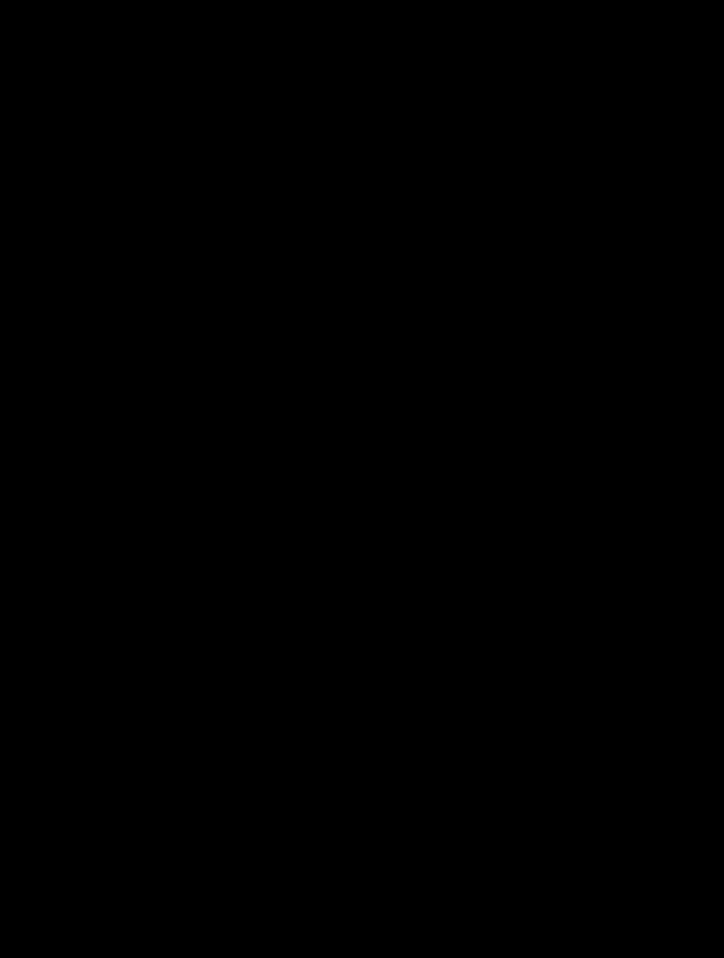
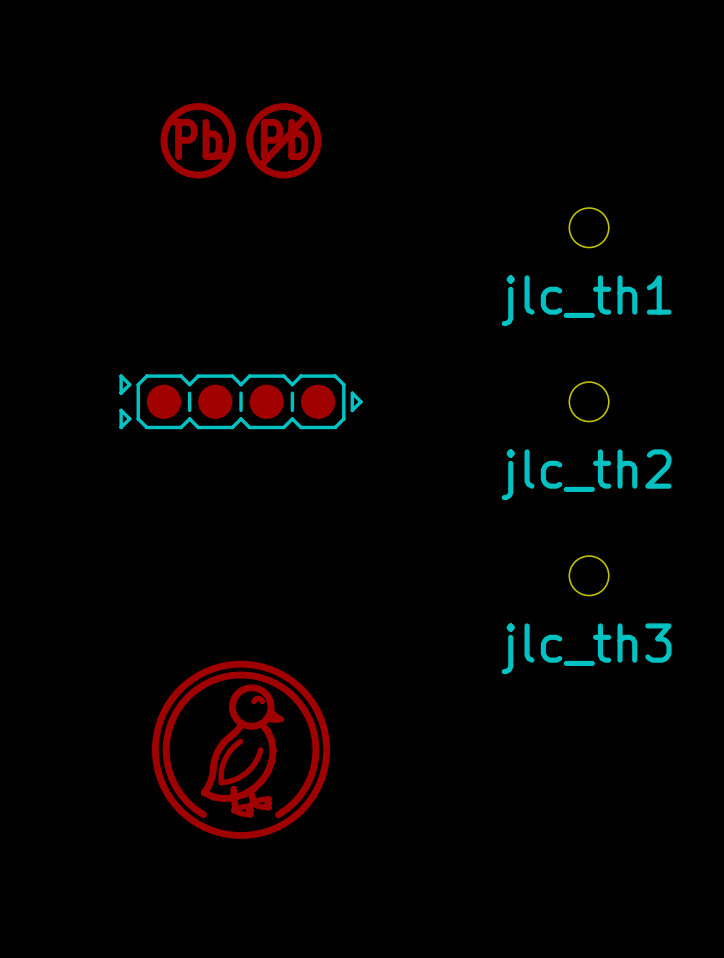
drawing: none -> [160, 103, 322, 179]
jlc_th1: none -> (589, 227)
drawing: none -> [119, 374, 363, 430]
jlc_th2: none -> (589, 401)
jlc_th3: none -> (589, 575)
drawing: none -> [151, 660, 331, 839]

